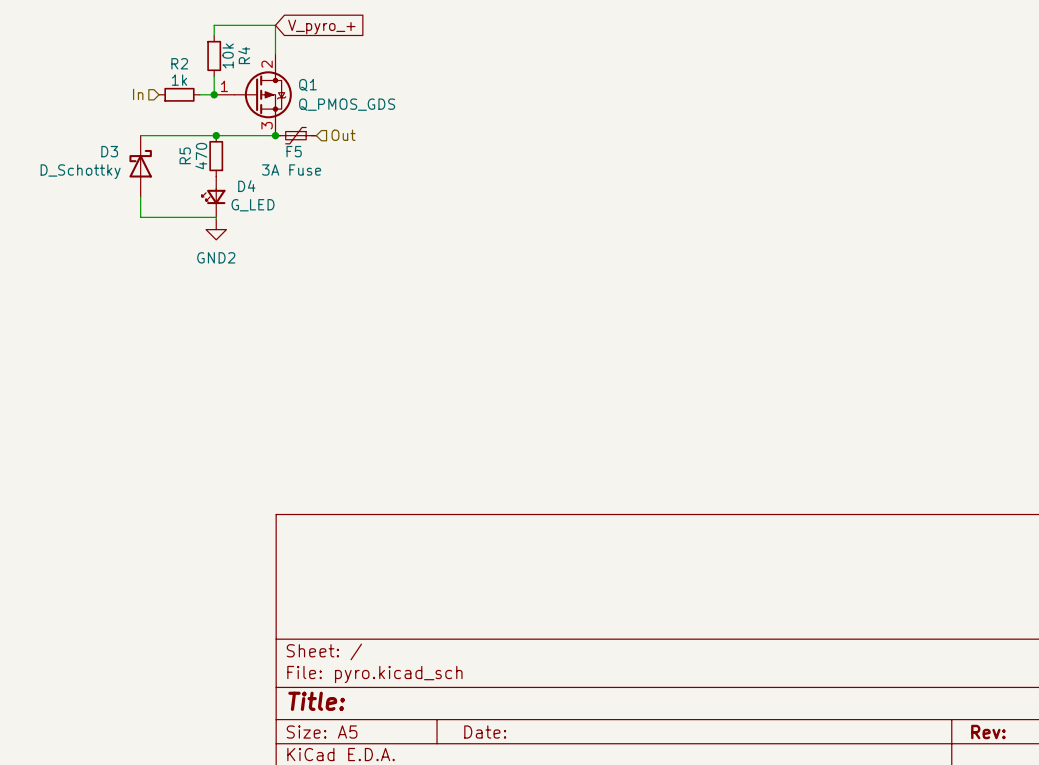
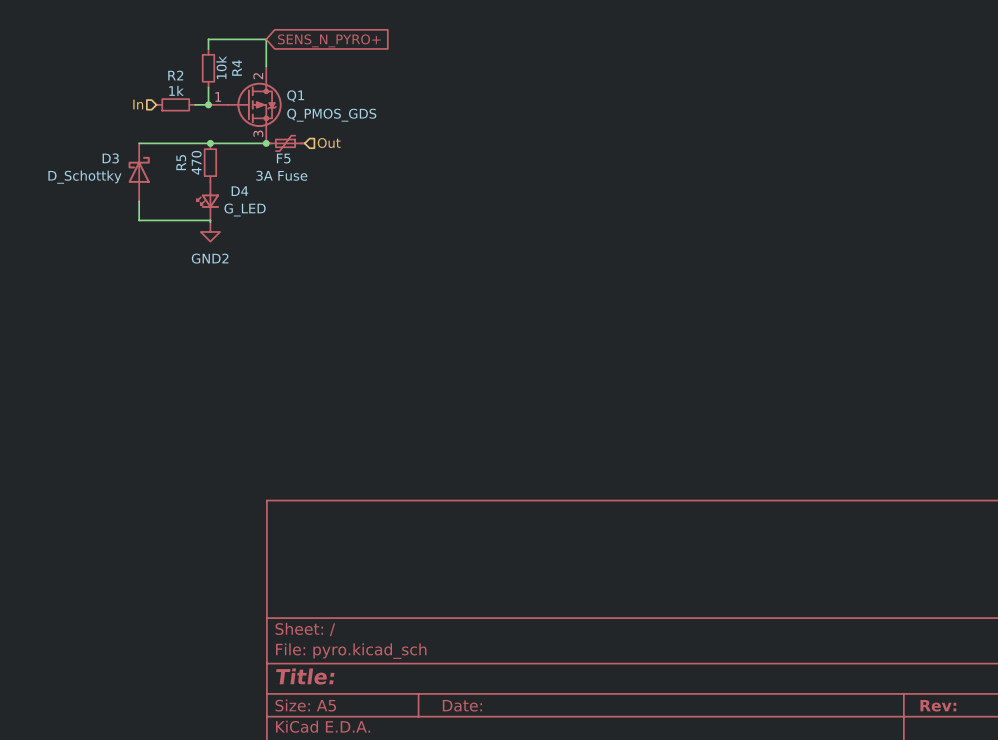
global label: V_pyro_+ (321, 27) -> SENS_N_PYRO+ (329, 40)

